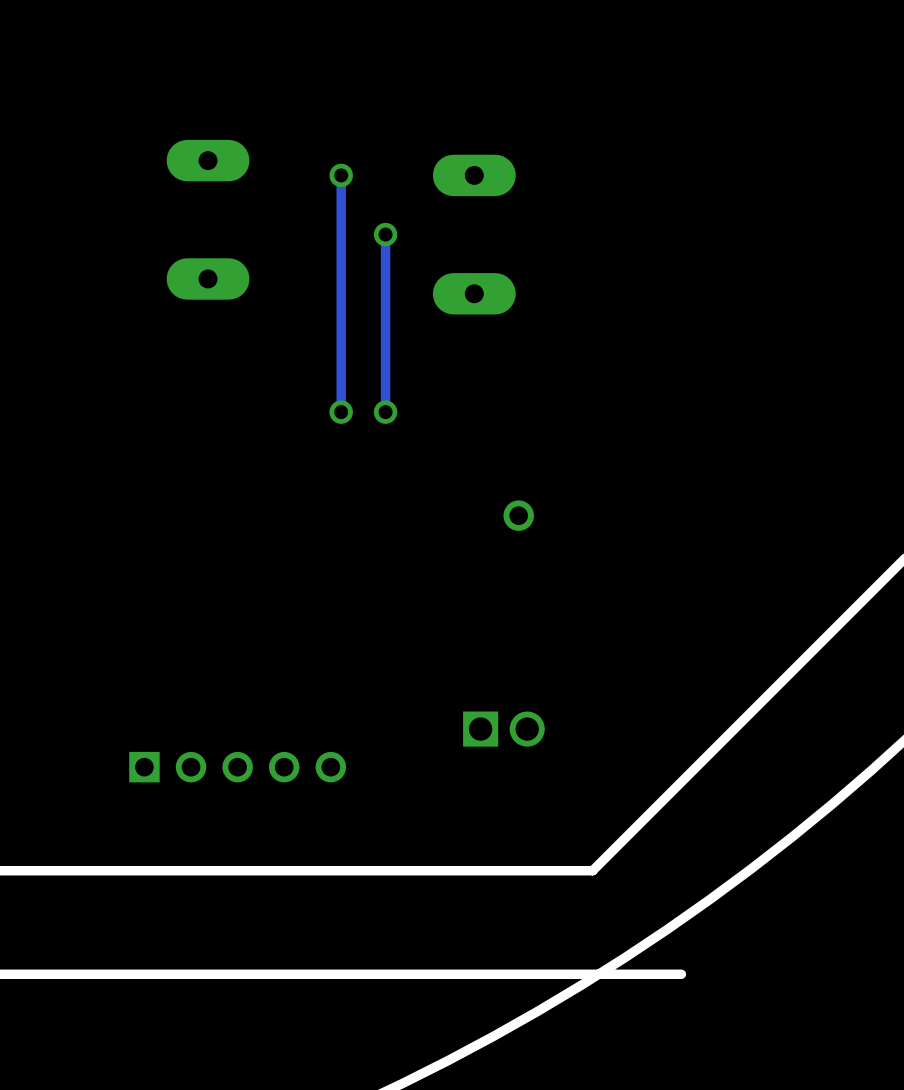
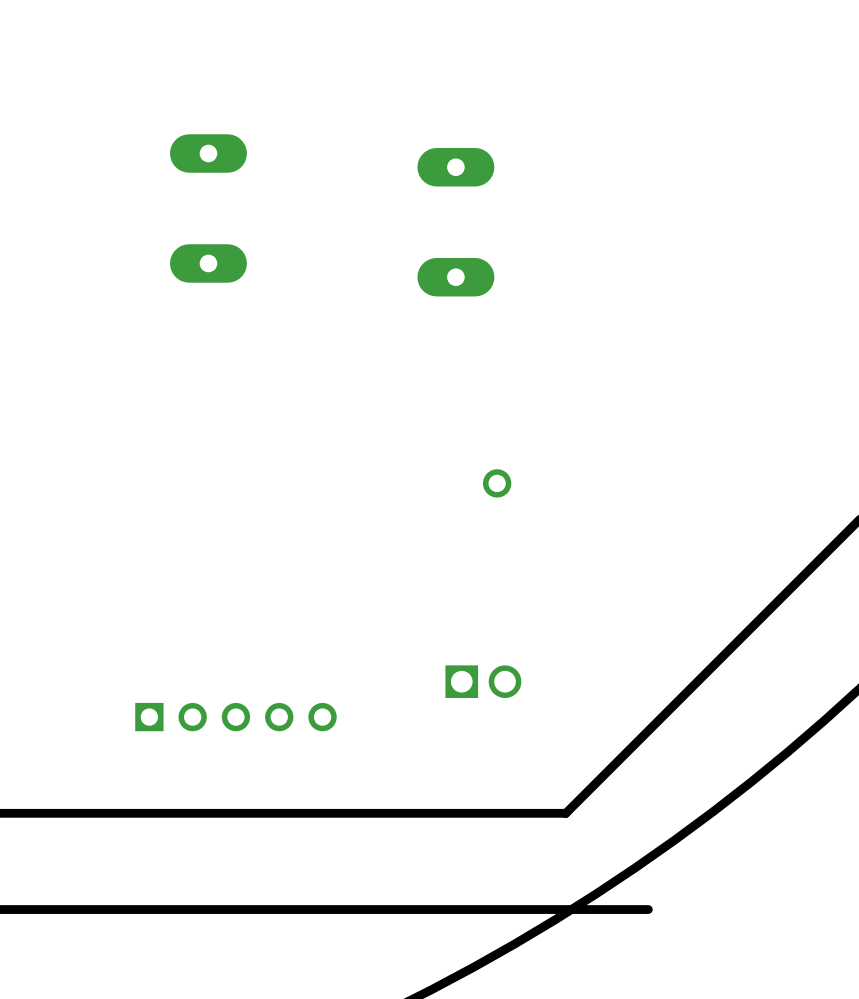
track: (341, 175) (341, 412) -> none
via: (341, 175) -> none
track: (385, 234) (385, 412) -> none
via: (385, 234) -> none
via: (341, 412) -> none
via: (385, 412) -> none

